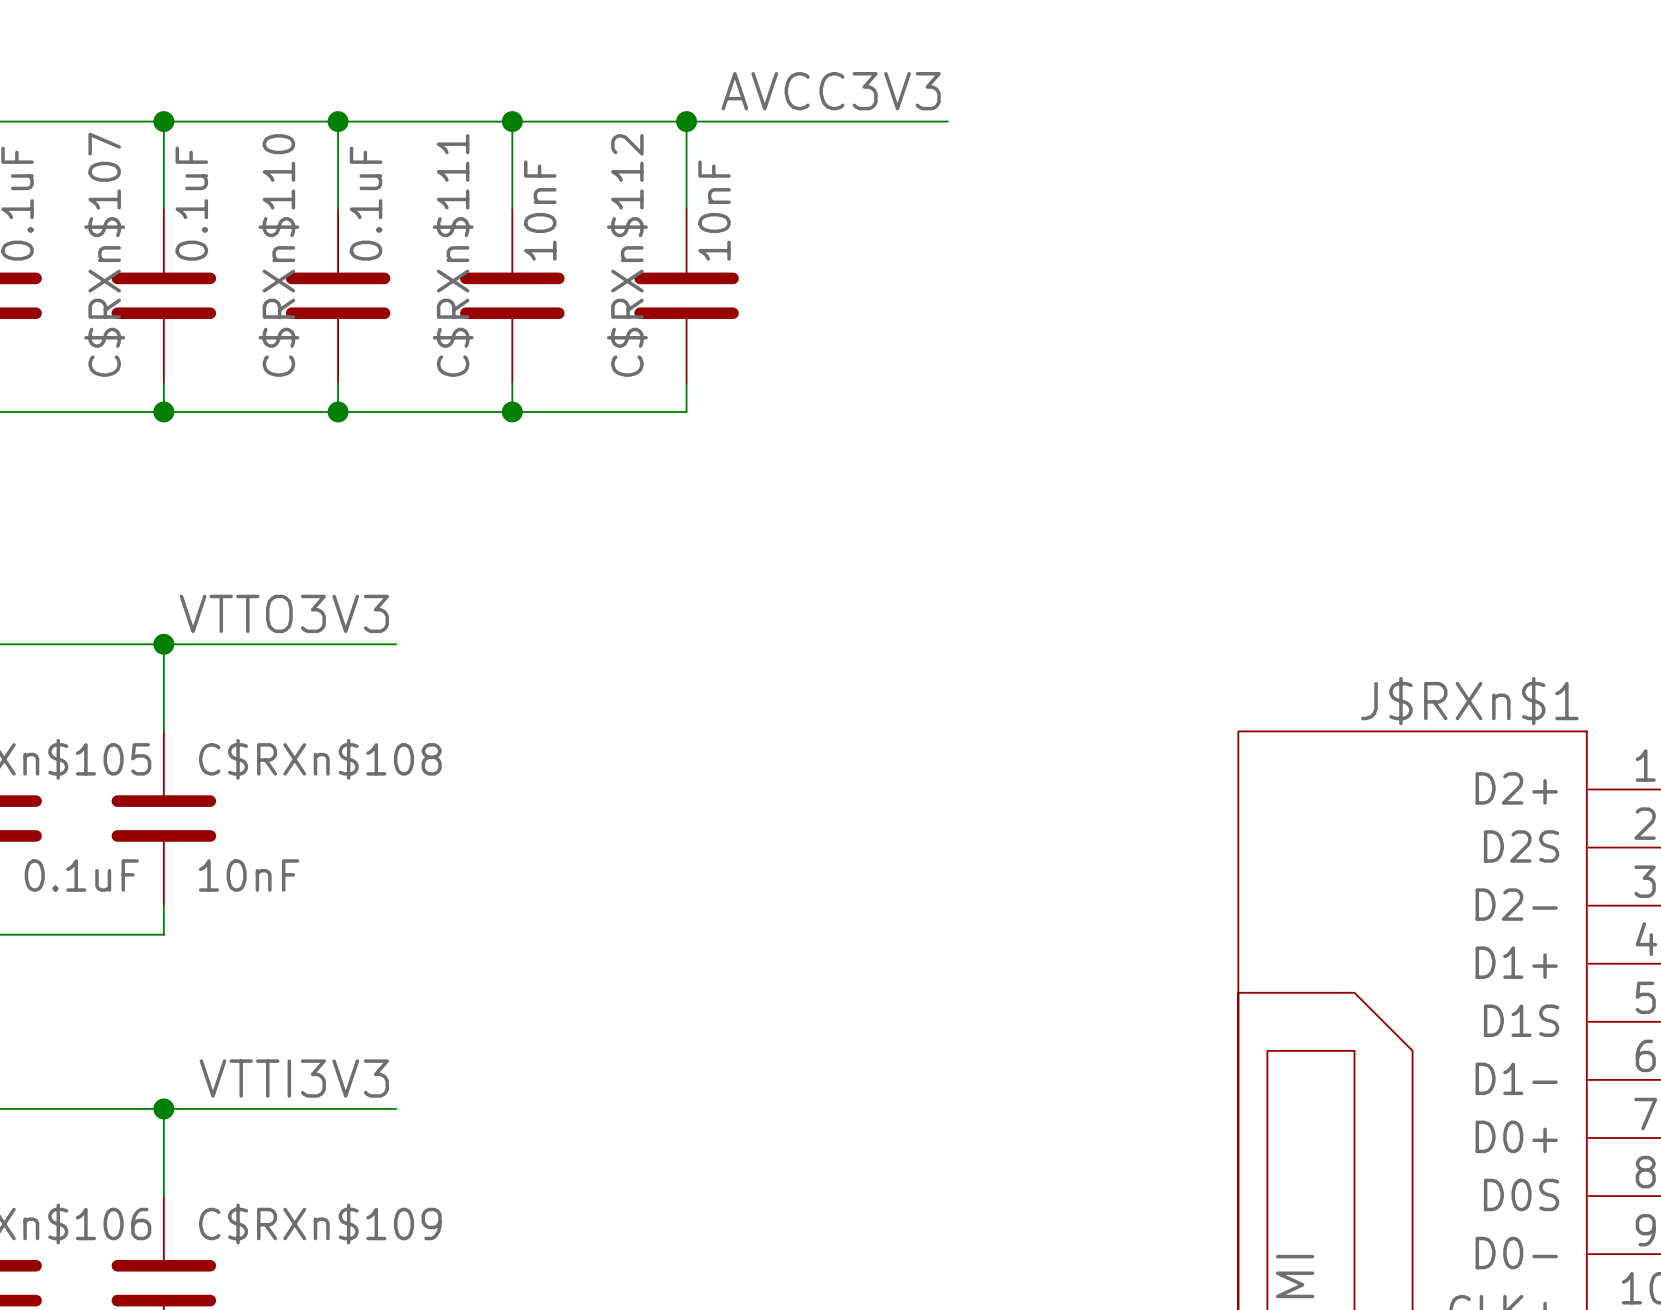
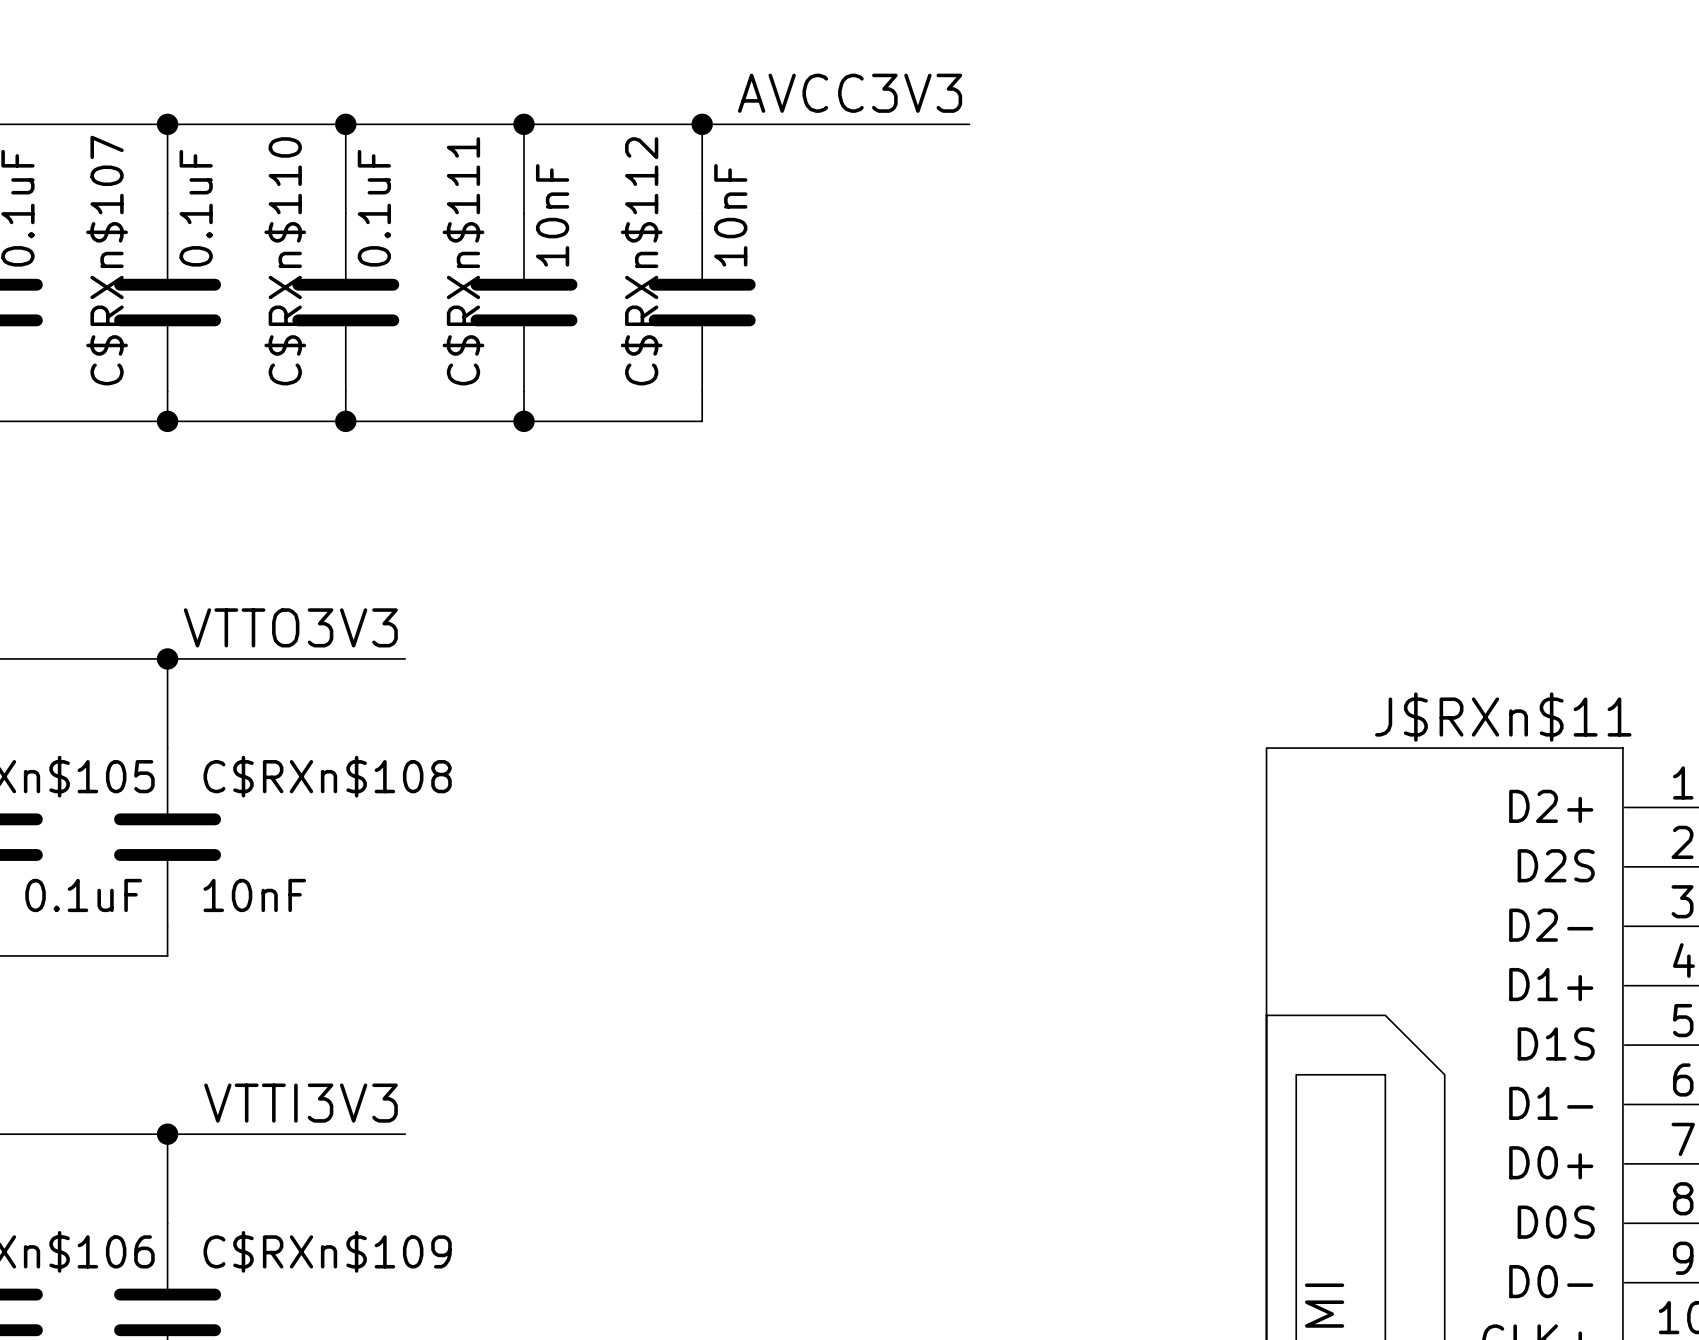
J$RXn$1 name: J$RXn$1 (1469, 701) -> J$RXn$11 (1503, 717)

